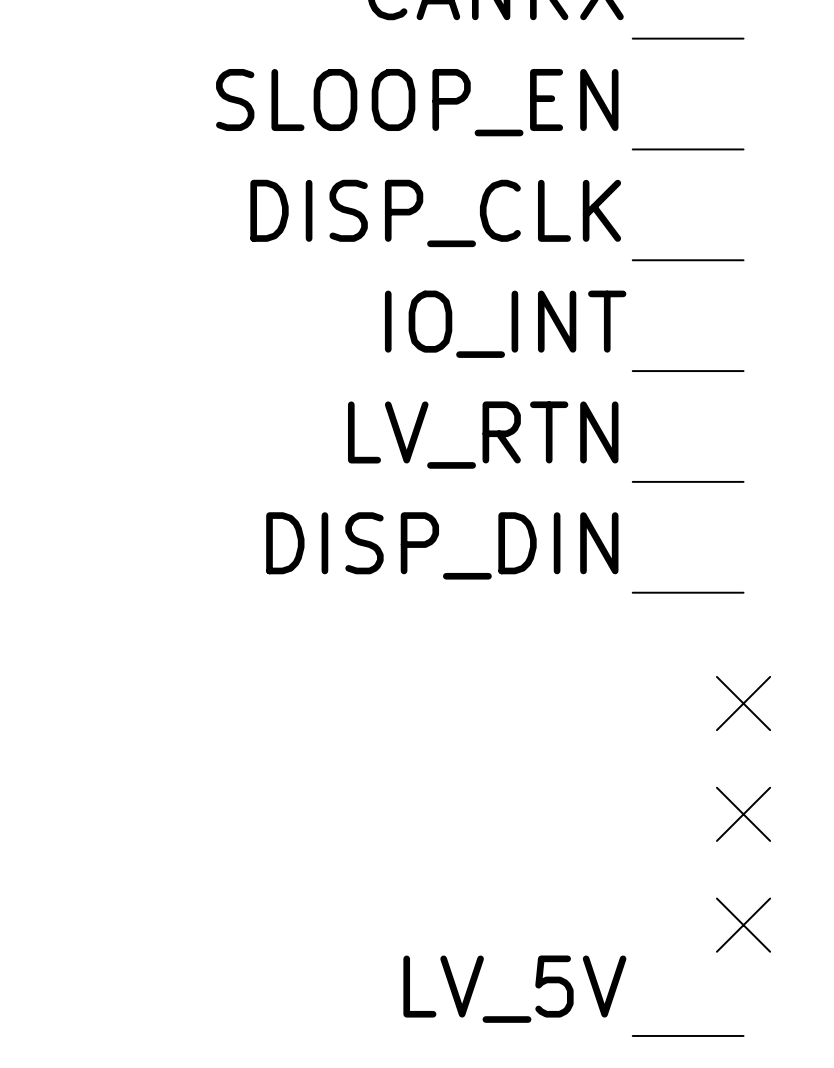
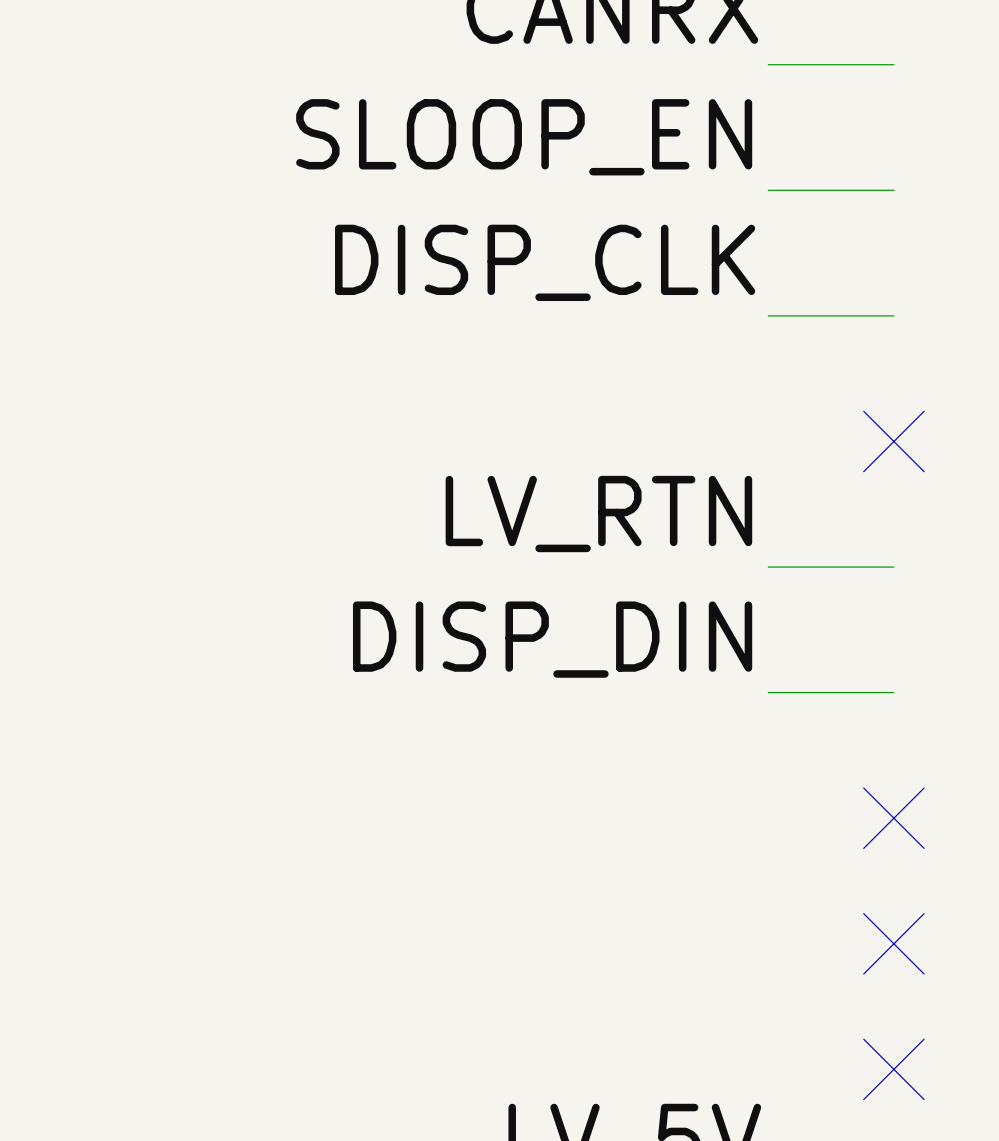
label: IO_INT (505, 324) -> none
wire: (632, 371) (743, 371) -> none
no-connect mark: none -> (893, 441)

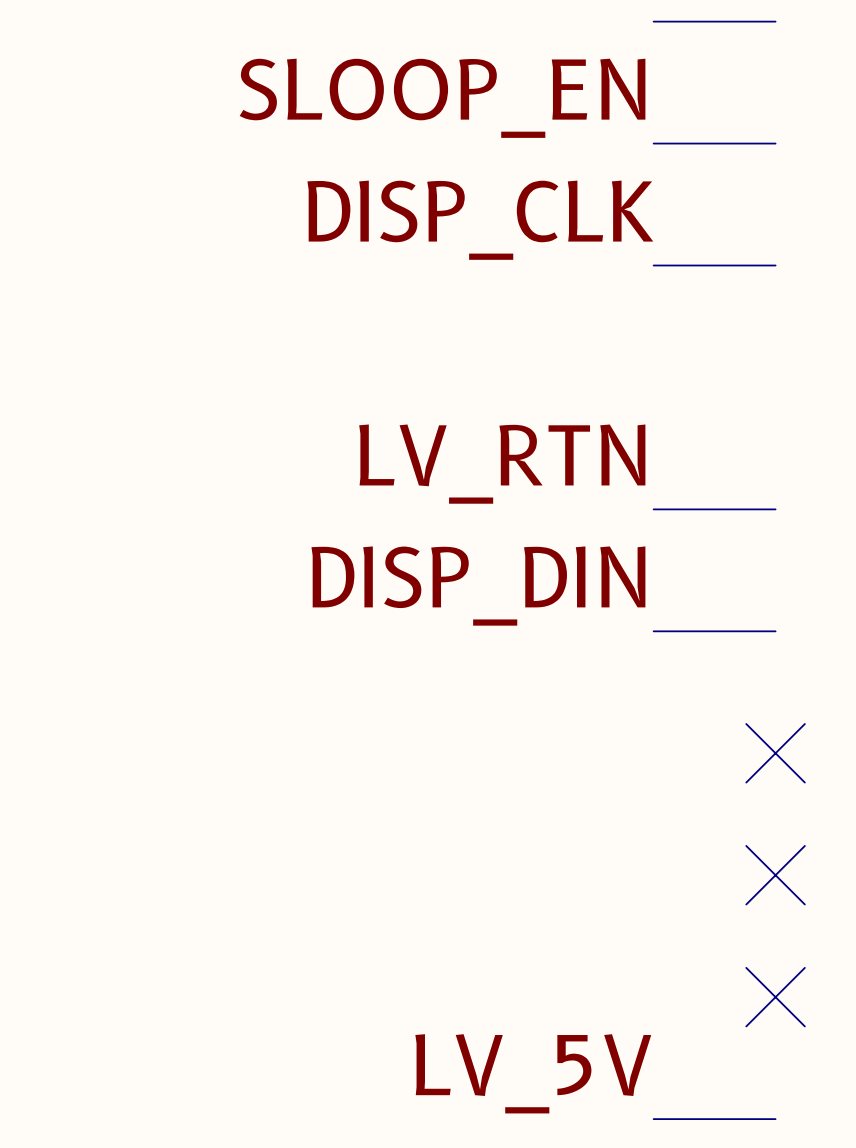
no-connect mark: (893, 441) -> none

